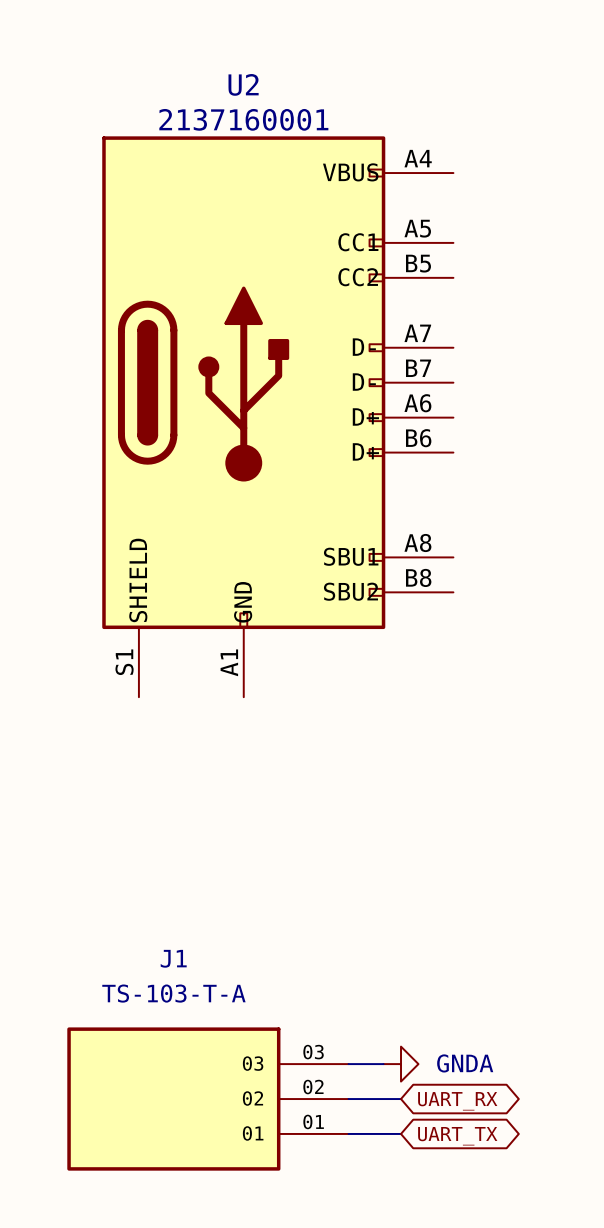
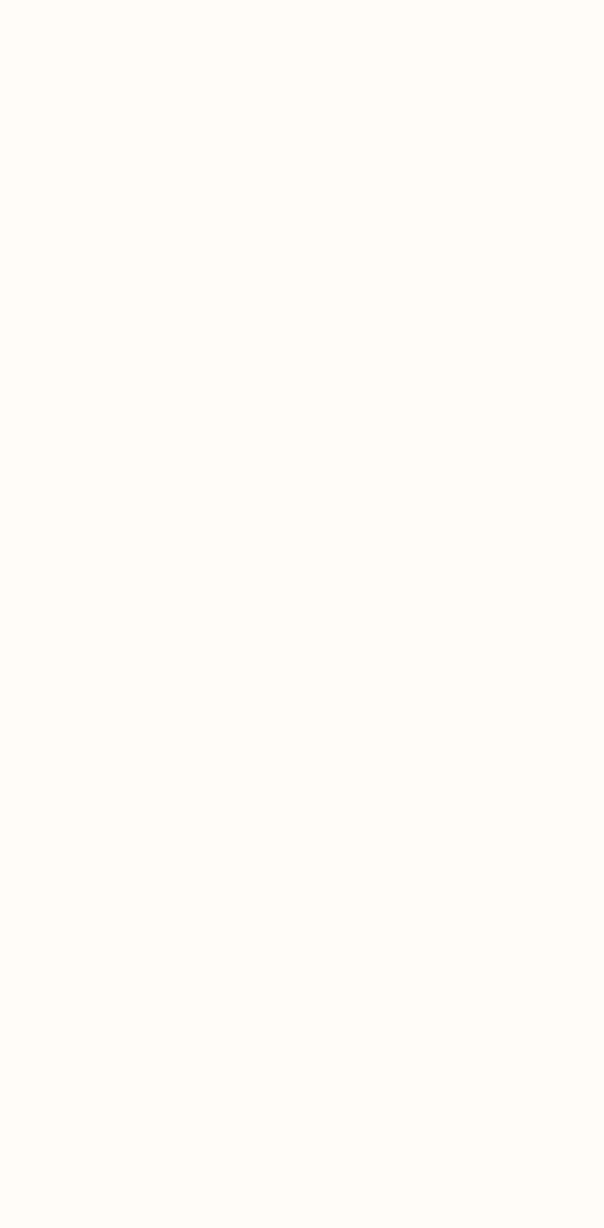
U2: 2137160001 (277, 416) -> none
wire: (348, 1064) (383, 1064) -> none
power symbol: GNDA (401, 1064) -> none
J1: TS-103-T-A (207, 1099) -> none
wire: (348, 1099) (401, 1099) -> none
global label: UART_RX (457, 1101) -> none
wire: (348, 1133) (401, 1133) -> none
global label: UART_TX (457, 1136) -> none

